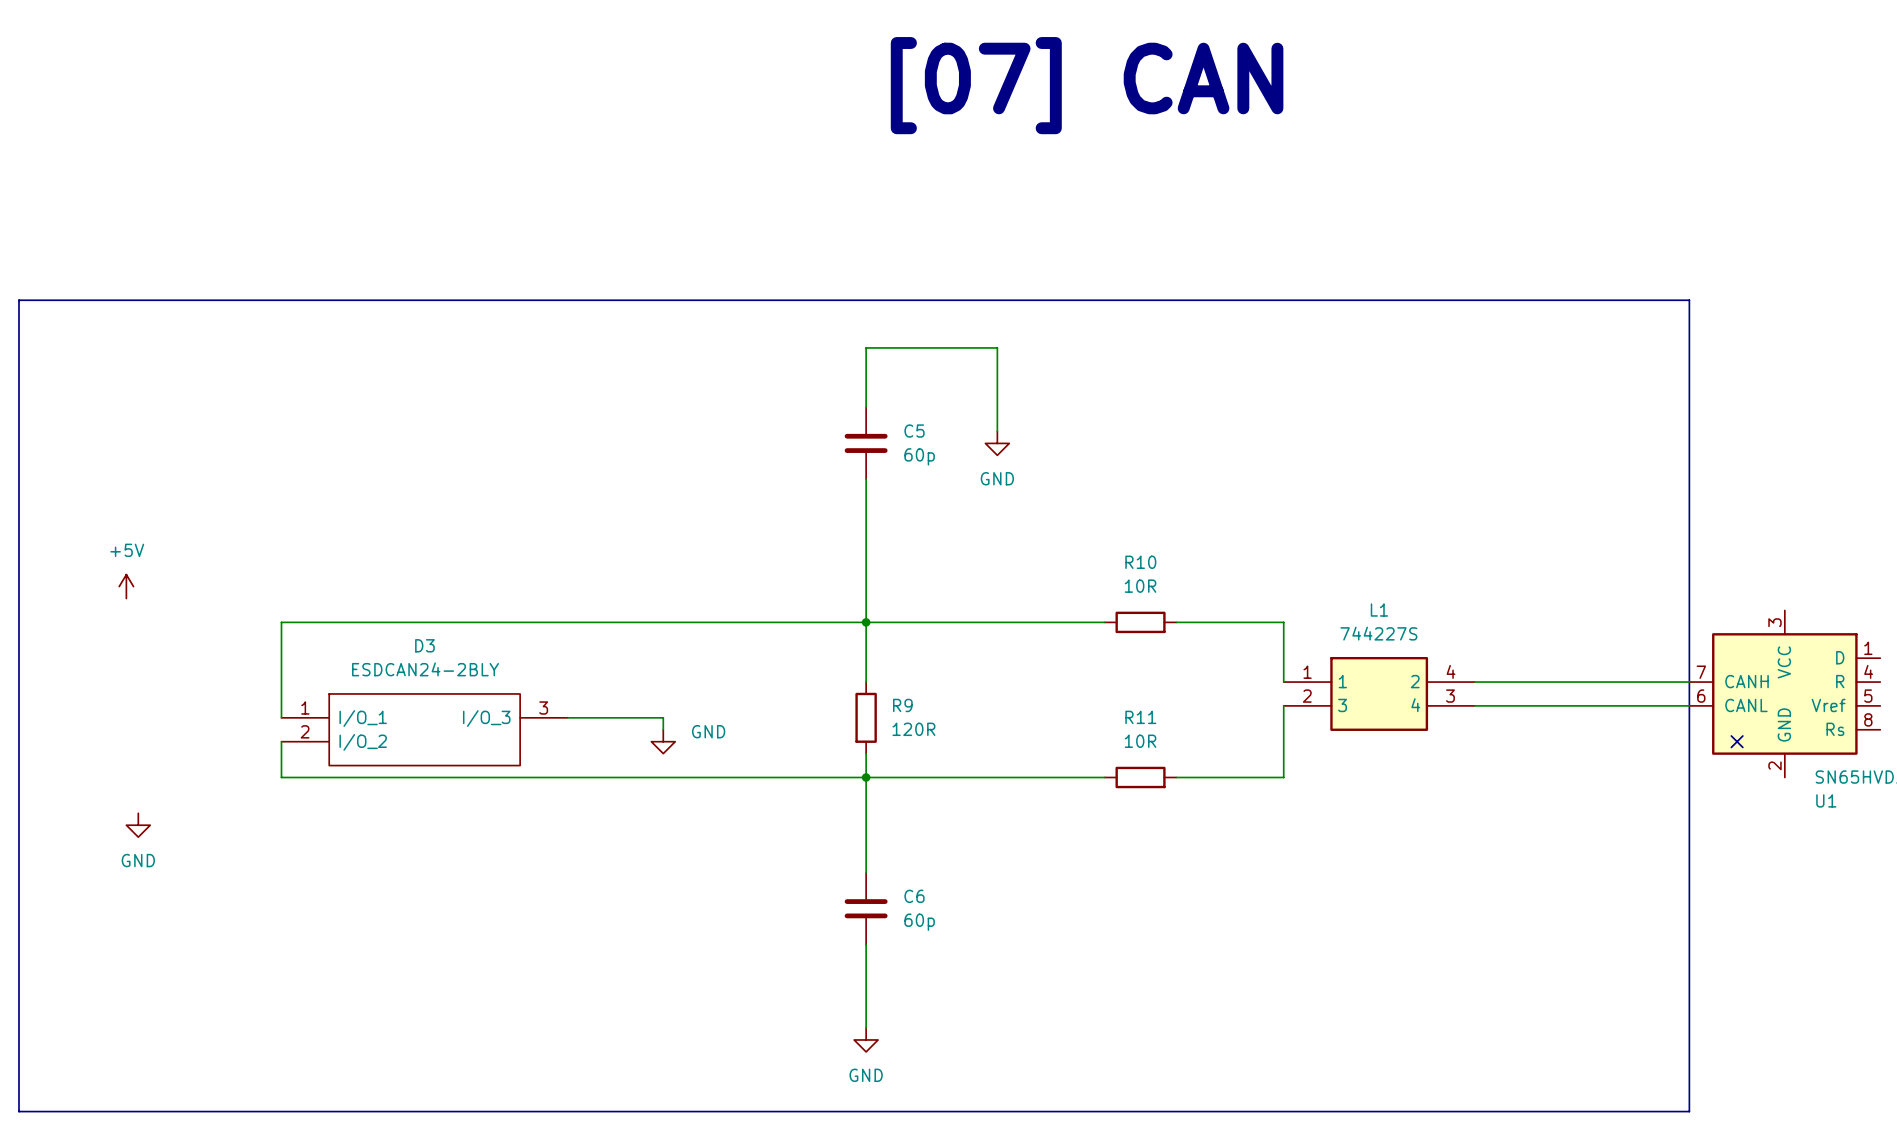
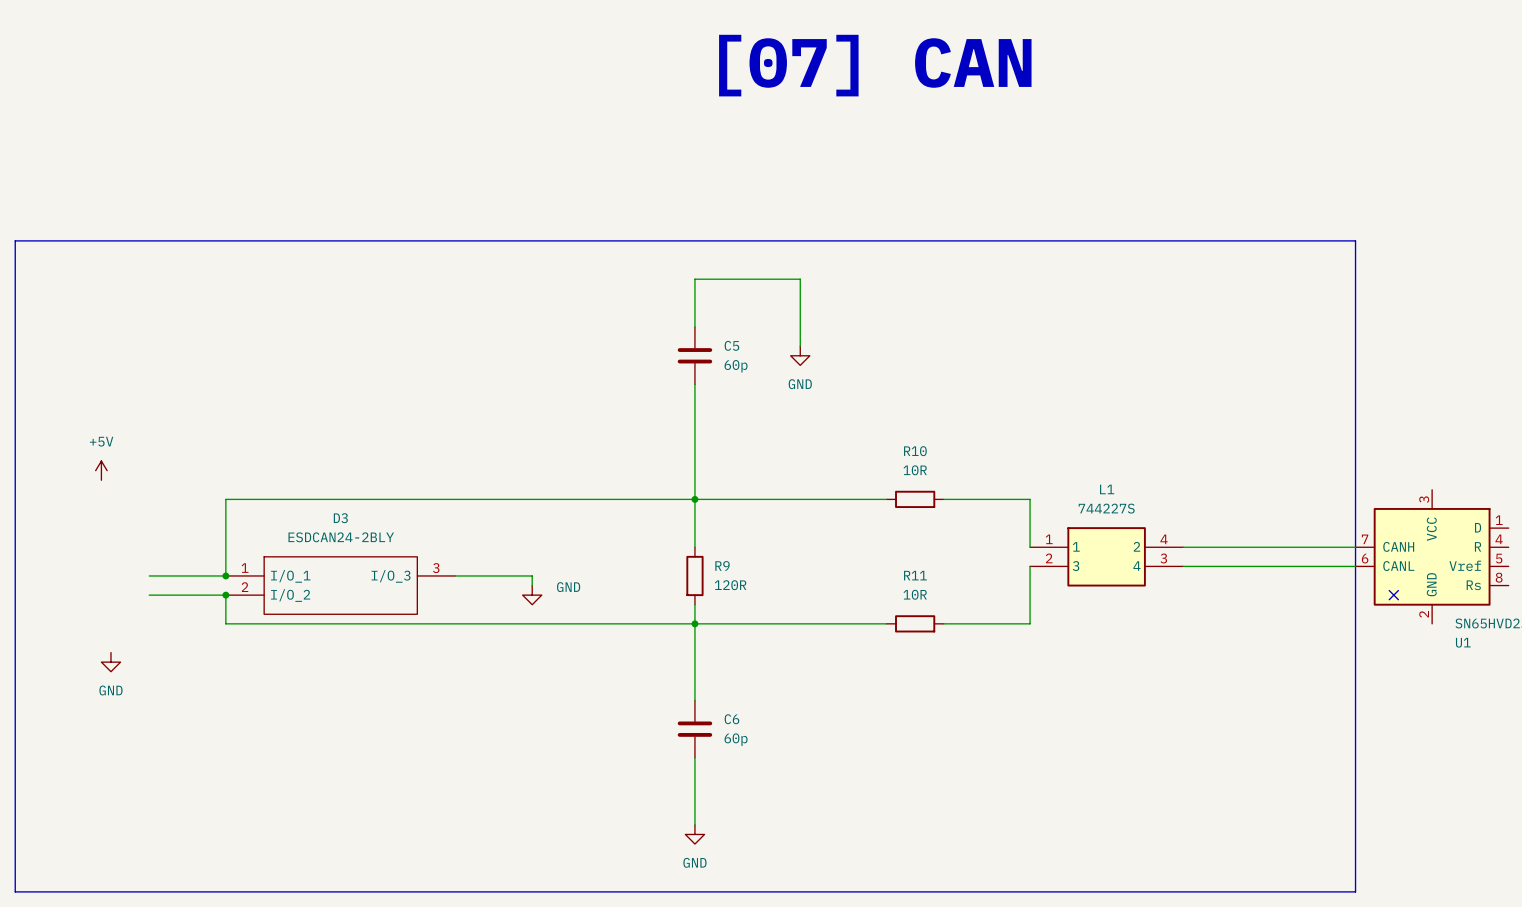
wire: none -> (149, 575) (225, 575)
junction: none -> (225, 575)
wire: none -> (149, 595) (225, 595)
junction: none -> (225, 595)

